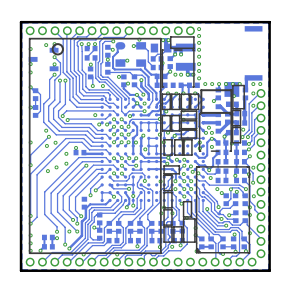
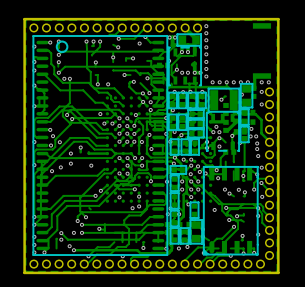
track: (55, 30) (63, 39) (63, 72) (69, 79) (69, 100) (77, 107) (102, 107) -> none
track: (66, 30) (66, 71) (73, 78) (73, 97) (79, 103) (103, 103) (110, 107) -> none
track: (79, 30) (70, 39) (70, 71) (76, 76) (76, 94) (81, 99) (102, 99) -> none
track: (90, 30) (92, 31) (86, 36) (77, 36) (74, 40) (74, 70) (79, 75) (79, 91) (83, 95) (103, 95) -> (42, 50) (48, 50) (51, 53) (51, 63) (54, 66) (54, 74) (62, 82) (89, 82) (98, 92) (109, 94)
track: (104, 30) (96, 39) (79, 39) (77, 42) (78, 70) (82, 74) (82, 88) (86, 92) (108, 92) (110, 99) -> none
track: (129, 30) (123, 37) (110, 37) -> (121, 28) (115, 34)
track: none -> (185, 28) (196, 39) (194, 54) (180, 55) (171, 65) (171, 75) (175, 80)
part footprint: [169, 36, 195, 50] -> [176, 33, 202, 47]
part footprint: [28, 37, 162, 255] -> [32, 35, 169, 256]
track: (104, 37) (99, 41) (98, 76) (101, 79) (106, 79) (125, 99) -> none
track: none -> (145, 37) (150, 42) (158, 42)
track: (113, 41) (105, 41) (102, 43) (100, 75) (108, 77) (129, 98) (129, 103) (125, 107) -> (118, 38) (134, 38) (147, 27)
track: (120, 45) (117, 45) (117, 52) (113, 56) (113, 67) (114, 69) (140, 69) (148, 76) (148, 85) (156, 92) (156, 99) -> none
track: (133, 46) (143, 45) (148, 51) (148, 61) (153, 67) -> none
part: (91, 48) -> none
part: (161, 48) -> none
part footprint: [161, 49, 195, 88] -> [168, 46, 202, 87]
part: (107, 51) -> none
track: none -> (158, 50) (62, 51) (58, 54)
part: (130, 54) -> none
track: (54, 57) (60, 63) (60, 74) (54, 80) (54, 100) (48, 106) (48, 120) (59, 131) (87, 131) (94, 138) -> (42, 121) (50, 121) (61, 110) (69, 110) (96, 137) (99, 137)
part: (91, 57) -> none
track: (95, 57) (95, 78) (99, 82) (105, 82) (121, 98) (121, 111) (125, 115) (129, 111) (144, 111) -> (158, 177) (164, 177) (168, 172) (168, 166) (166, 163) (166, 139) (170, 135) (170, 131) (164, 125) (150, 124) (150, 110)
part: (185, 57) -> none
part: (157, 58) -> none
part: (43, 59) -> none
part: (170, 62) -> none
part: (107, 68) -> none
part: (90, 72) -> none
track: (54, 74) (49, 79) (49, 98) (43, 104) (43, 122) (56, 134) (85, 134) (93, 142) (106, 142) (110, 145) -> (58, 72) (65, 66) (158, 66)
part: (161, 76) -> none
track: (60, 80) (60, 102) (53, 108) (53, 119) (62, 127) (89, 127) (96, 134) -> (42, 137) (36, 137) (34, 135) (34, 120) (36, 117) (48, 117) (59, 106) (72, 106) (101, 133)
part: (123, 80) -> none
part: (134, 80) -> none
track: (141, 80) (141, 86) (148, 93) (148, 99) -> (147, 78) (164, 78) (169, 87) (227, 87) (234, 93) (234, 102) (244, 102) (244, 114) (255, 114) (261, 120) (261, 133) (269, 142)
part footprint: [232, 84, 245, 110] -> [240, 83, 254, 109]
part: (161, 85) -> none
part: (177, 85) -> none
part: (193, 85) -> none
part footprint: [200, 89, 233, 114] -> [207, 87, 241, 113]
part: (231, 89) -> none
part footprint: [161, 93, 171, 111] -> [168, 91, 178, 110]
part footprint: [170, 93, 181, 111] -> [177, 91, 188, 110]
part footprint: [180, 93, 190, 111] -> [187, 91, 198, 110]
part footprint: [189, 93, 200, 111] -> [197, 91, 207, 110]
part: (218, 93) -> none
track: (260, 93) (249, 103) (249, 130) (242, 137) -> none
part: (35, 94) -> none
track: (245, 97) (244, 123) -> none
part: (232, 104) -> none
track: (260, 105) (260, 103) (251, 112) (251, 131) (247, 137) -> none
track: (218, 106) (220, 106) (227, 114) -> none
part footprint: [231, 109, 242, 127] -> [239, 108, 250, 126]
part footprint: [180, 110, 198, 120] -> [187, 109, 205, 119]
part: (35, 111) -> none
part footprint: [198, 113, 232, 152] -> [206, 112, 240, 152]
part footprint: [161, 114, 171, 132] -> [168, 113, 178, 131]
part footprint: [170, 114, 181, 132] -> [177, 113, 188, 131]
track: (218, 114) (203, 115) -> none
track: (260, 118) (254, 120) (254, 133) (251, 135) (251, 141) (248, 143) (244, 142) -> none
track: (114, 119) (117, 122) -> (119, 118) (103, 102) (95, 102) (83, 90) (60, 90) (42, 74)
part footprint: [180, 120, 198, 130] -> [187, 119, 205, 129]
part footprint: [231, 126, 242, 144] -> [239, 125, 250, 143]
part footprint: [180, 129, 198, 139] -> [187, 128, 205, 139]
track: (260, 130) (254, 137) (254, 144) (244, 152) -> none
track: (48, 136) (30, 155) -> (72, 119) (70, 124) (55, 139) (55, 147) (52, 149) (36, 149) (34, 154)
track: (156, 138) (148, 138) (148, 153) -> none
part footprint: [163, 139, 173, 156] -> [169, 138, 180, 156]
part footprint: [173, 139, 184, 156] -> [180, 138, 191, 156]
part footprint: [183, 139, 193, 156] -> [190, 138, 200, 156]
part: (222, 142) -> none
part: (240, 142) -> none
part: (79, 152) -> none
part: (240, 152) -> none
track: (117, 153) (121, 158) -> (42, 232) (46, 232) (51, 227) (51, 214) (65, 200) (96, 200) (116, 180) (126, 180) (131, 175) (131, 162) (127, 158)
track: none -> (131, 153) (116, 153) (111, 158) (50, 158) (46, 153) (42, 153)
track: (249, 156) (244, 161) (253, 173) (253, 182) -> (269, 192) (269, 189) (261, 183)
track: (102, 161) (82, 161) (51, 193) (51, 213) (65, 227) (65, 244) -> none
track: (110, 161) (105, 157) (78, 157) (44, 192) (44, 214) (57, 226) (57, 231) -> (158, 232) (145, 232) (139, 239) (67, 239) (61, 233)
part: (222, 161) -> none
part: (240, 161) -> none
track: none -> (41, 163) (42, 185) (46, 185) (55, 175) (97, 175) (104, 169)
track: (86, 165) (57, 194) (57, 211) (77, 231) -> (158, 224) (147, 224) (139, 232) (81, 232)
part footprint: [163, 165, 181, 175] -> [169, 165, 187, 175]
part footprint: [195, 166, 251, 254] -> [203, 166, 259, 256]
track: (98, 169) (96, 169) (69, 196) (69, 210) (77, 217) (77, 223) -> (158, 217) (149, 217) (142, 224) (81, 224)
track: (117, 169) (113, 165) (93, 165) (63, 195) (63, 210) (73, 219) -> (158, 193) (166, 195) (164, 204) (149, 204) (142, 212) (82, 212) (77, 216) (77, 221)
part: (222, 171) -> none
part: (240, 171) -> none
part footprint: [163, 174, 173, 192] -> [169, 174, 180, 192]
track: none -> (135, 176) (128, 184) (121, 184) (99, 205) (67, 205) (57, 216) (57, 230) (47, 240) (42, 240)
track: (102, 177) (90, 188) (90, 195) -> (42, 208) (50, 208) (63, 195) (95, 195)
track: (133, 177) (133, 205) -> none
track: (141, 177) (137, 186) (144, 191) (144, 209) (125, 228) (125, 243) (121, 247) (113, 247) (105, 255) (98, 255) (91, 259) (91, 262) -> none
track: (172, 177) (168, 180) (168, 186) (160, 191) (160, 202) (147, 214) (147, 219) (152, 224) -> none
track: (195, 177) (199, 180) (205, 180) (209, 185) (239, 185) (245, 189) -> (269, 180) (258, 178) (254, 183) (254, 189)
part: (222, 180) -> none
part: (240, 180) -> none
track: (244, 180) (249, 185) (249, 201) (252, 203) -> (191, 181) (195, 185) (200, 185) (219, 204) (260, 204)
track: (141, 184) (152, 191) (152, 205) (139, 218) (139, 223) (144, 228) (144, 244) (138, 250) (114, 250) (104, 262) -> none
track: (195, 184) (199, 189) (199, 194) (211, 203) (211, 211) (221, 218) -> (197, 264) (200, 264) (206, 257) (212, 257) (216, 252) (224, 252) (224, 242) (238, 228) (238, 222) (235, 220) (229, 220)
track: (203, 184) (205, 189) (217, 201) (218, 207) -> (269, 230) (262, 222) (262, 213) (257, 207) (226, 207)
part footprint: [163, 191, 173, 209] -> [169, 192, 180, 210]
track: (117, 192) (121, 196) (121, 201) (113, 210) (94, 210) (91, 212) (91, 220) (87, 224) (87, 239) (72, 254) (62, 254) (54, 262) -> none
track: (125, 192) (129, 198) (126, 207) -> none
track: (141, 192) (137, 198) (137, 208) (133, 211) (121, 211) (104, 228) (103, 242) (88, 242) (67, 262) -> none
track: (172, 192) (176, 196) (179, 220) (187, 228) (187, 244) (180, 250) (169, 250) (163, 255) (158, 255) (153, 262) -> none
track: (187, 192) (191, 196) (191, 212) (213, 234) (218, 234) (223, 238) (218, 243) (220, 253) -> (210, 264) (218, 255) (227, 255)
track: (195, 192) (199, 198) (199, 211) (216, 229) (238, 227) (242, 231) (242, 238) (249, 244) (249, 252) (239, 262) -> none
track: (245, 195) (243, 195) (243, 192) (238, 187) (232, 187) (230, 198) (226, 203) -> none
track: (114, 196) (109, 192) (102, 192) (102, 200) -> none
part: (226, 199) -> none
part: (235, 199) -> none
part: (245, 199) -> none
track: (110, 200) (105, 204) (90, 204) (85, 208) (85, 217) (81, 221) (81, 235) (69, 248) -> (207, 148) (200, 148) (197, 151) (174, 151) (174, 157) (181, 163) (181, 173) (186, 179) (186, 192) (183, 194) (183, 216) (168, 228) (168, 243) (171, 246) (169, 253) (140, 253) (137, 250) (73, 250)
track: (117, 200) (110, 207) (92, 207) (89, 210) (89, 219) (85, 223) (85, 238) (71, 252) (52, 252) (42, 262) -> none
track: (125, 200) (114, 213) (99, 213) (94, 217) (94, 221) (90, 225) (90, 237) (93, 239) (99, 239) (99, 238) -> none
part footprint: [182, 200, 193, 218] -> [189, 201, 200, 219]
track: (187, 200) (187, 212) (209, 234) (209, 238) (215, 243) (215, 262) -> none
track: (195, 200) (195, 212) (215, 232) (236, 230) (239, 233) (239, 253) (236, 256) (232, 256) (227, 262) -> none
track: (203, 200) (203, 211) (217, 225) (226, 225) -> (184, 264) (185, 260) (198, 247) (211, 247) (211, 243) (216, 238) (222, 238) (234, 226)
part: (84, 203) -> none
part footprint: [163, 209, 173, 226] -> [169, 209, 180, 228]
track: (207, 209) (218, 222) (229, 221) (232, 225) (240, 225) (247, 220) (247, 224) (260, 238) (260, 241) -> none
part: (235, 216) -> none
part: (245, 216) -> none
part: (99, 218) -> none
part footprint: [182, 218, 196, 243] -> [189, 219, 203, 245]
track: (172, 221) (166, 223) (169, 236) (168, 247) (162, 253) (157, 253) (154, 255) (146, 253) (144, 255) (144, 262) (141, 262) -> none
track: (152, 222) (147, 228) (147, 245) (140, 252) (125, 252) (116, 262) -> none
part footprint: [163, 226, 173, 243] -> [169, 227, 180, 245]
part footprint: [173, 226, 183, 243] -> [179, 227, 190, 245]
part: (109, 227) -> none
part: (118, 227) -> none
part: (130, 227) -> none
part: (139, 227) -> none
part: (151, 227) -> none
part: (99, 234) -> none
part: (48, 237) -> none
part: (113, 240) -> none
part: (134, 240) -> none
part: (155, 240) -> none
part: (201, 242) -> none
part: (211, 242) -> none
part: (223, 242) -> none
part: (233, 242) -> none
part: (244, 242) -> none
part: (48, 246) -> none

